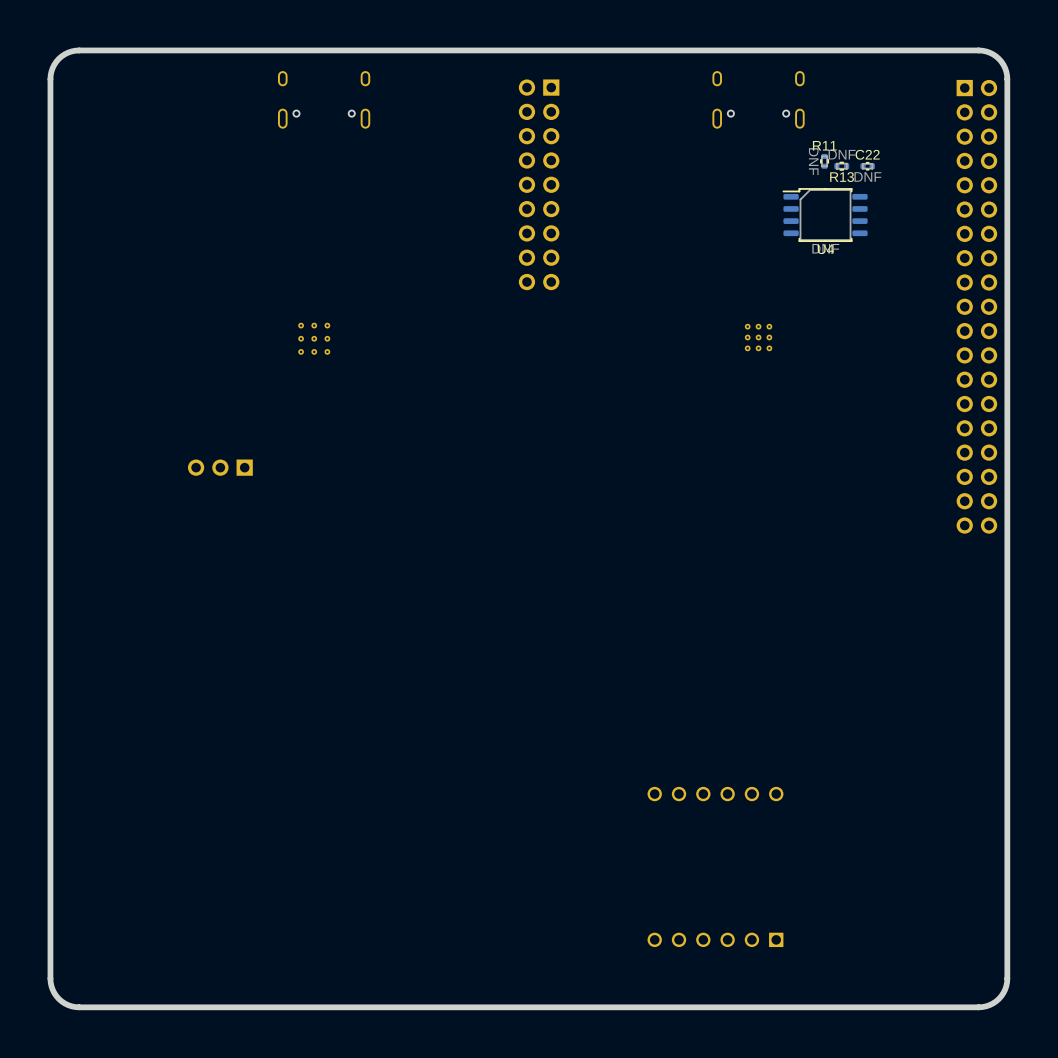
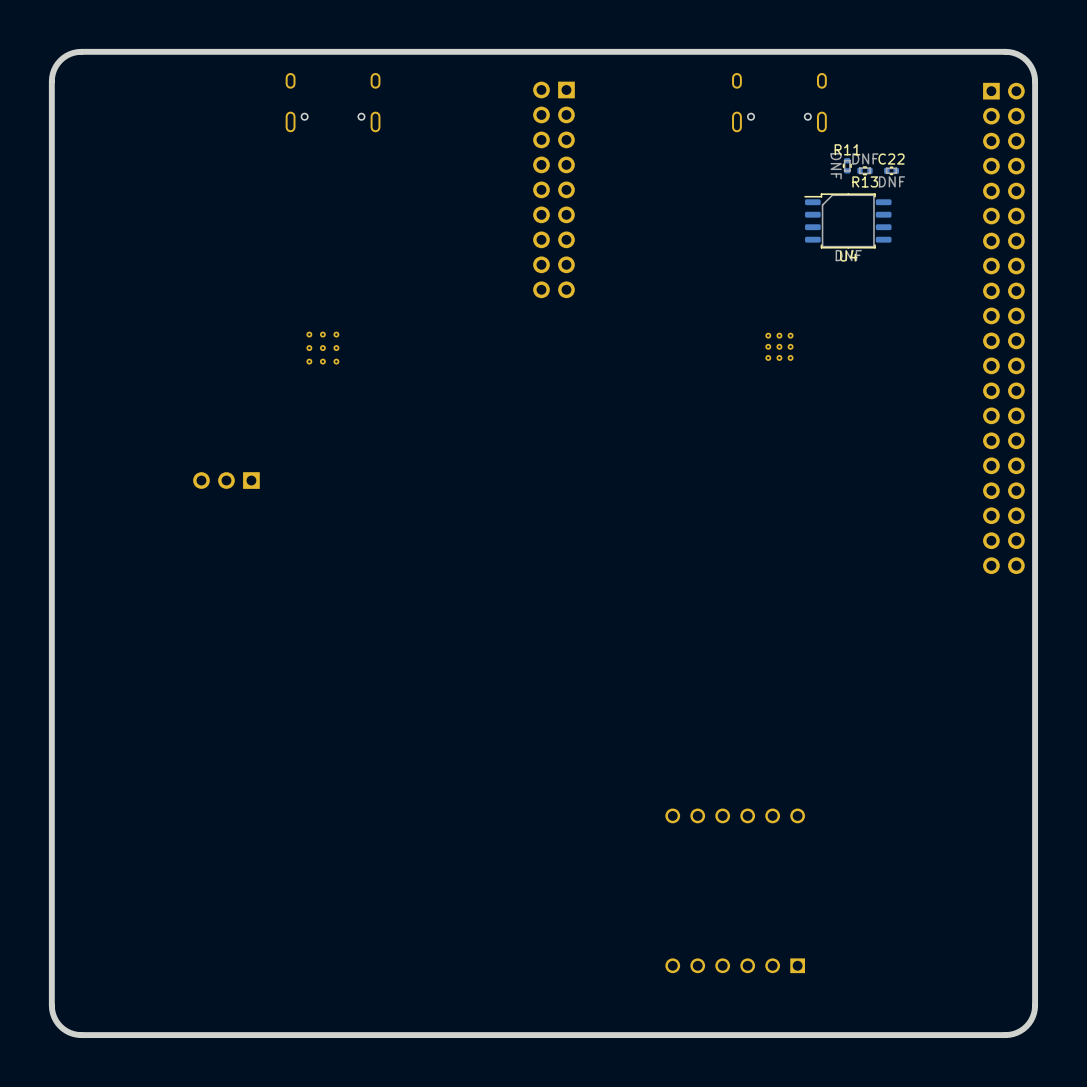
part: (976, 306) -> none
part: none -> (1003, 328)

